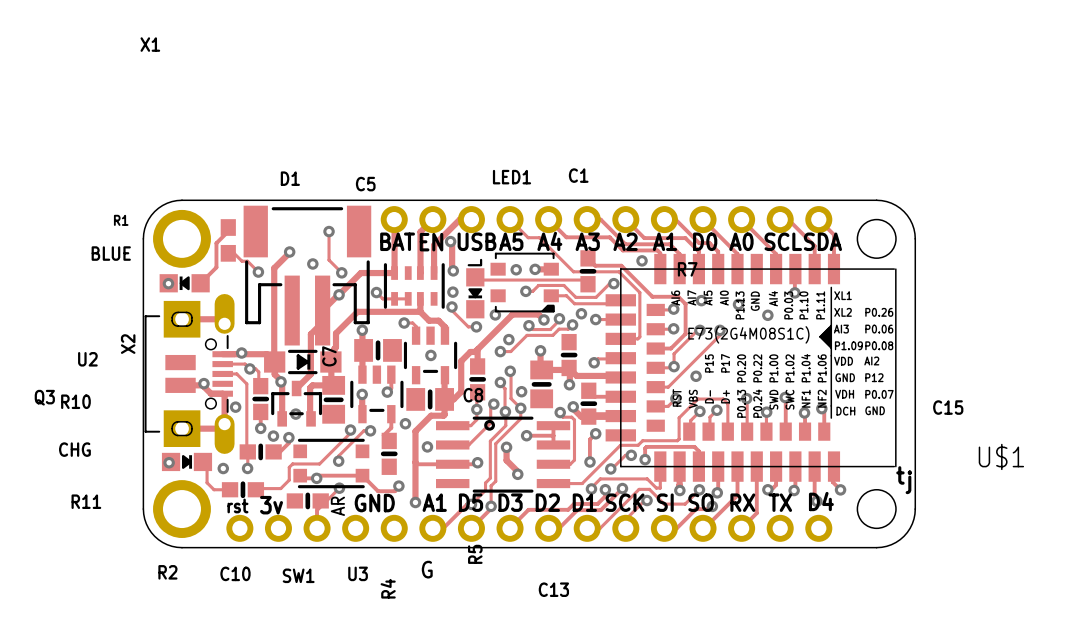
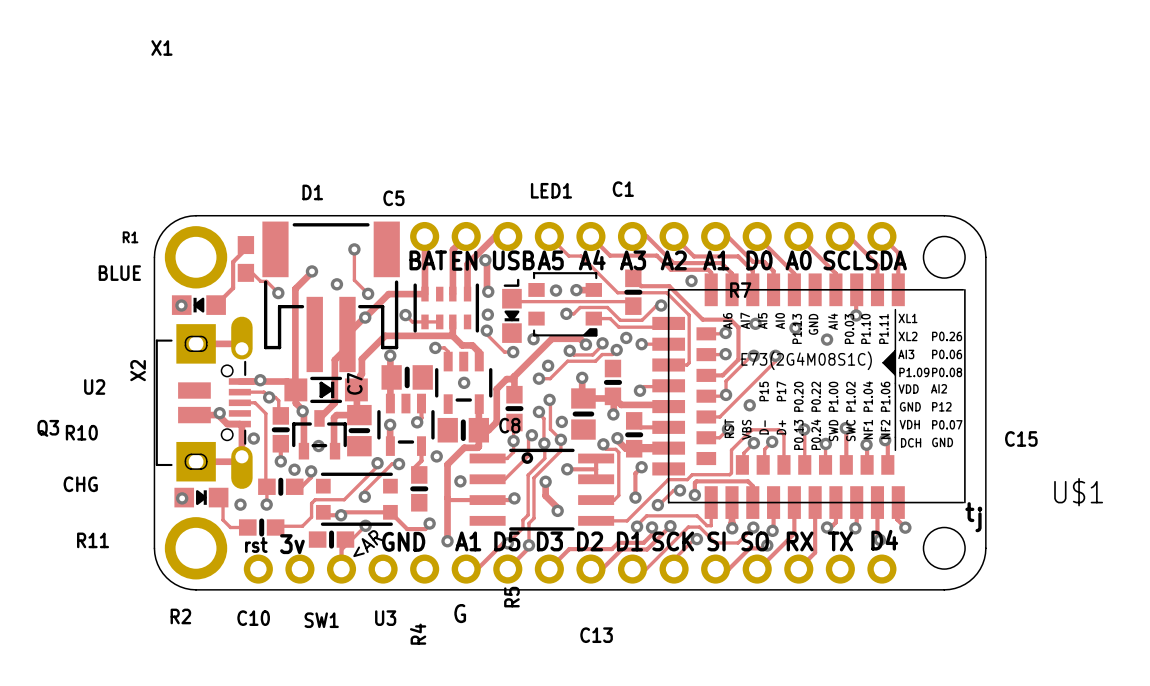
text: AR (337, 506) -> <AR (368, 543)

